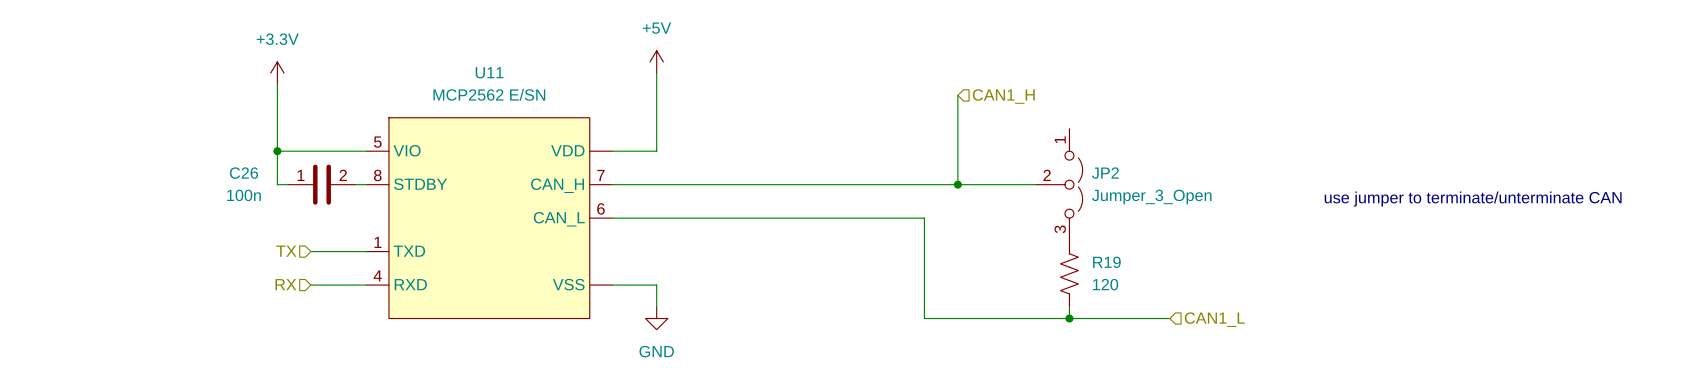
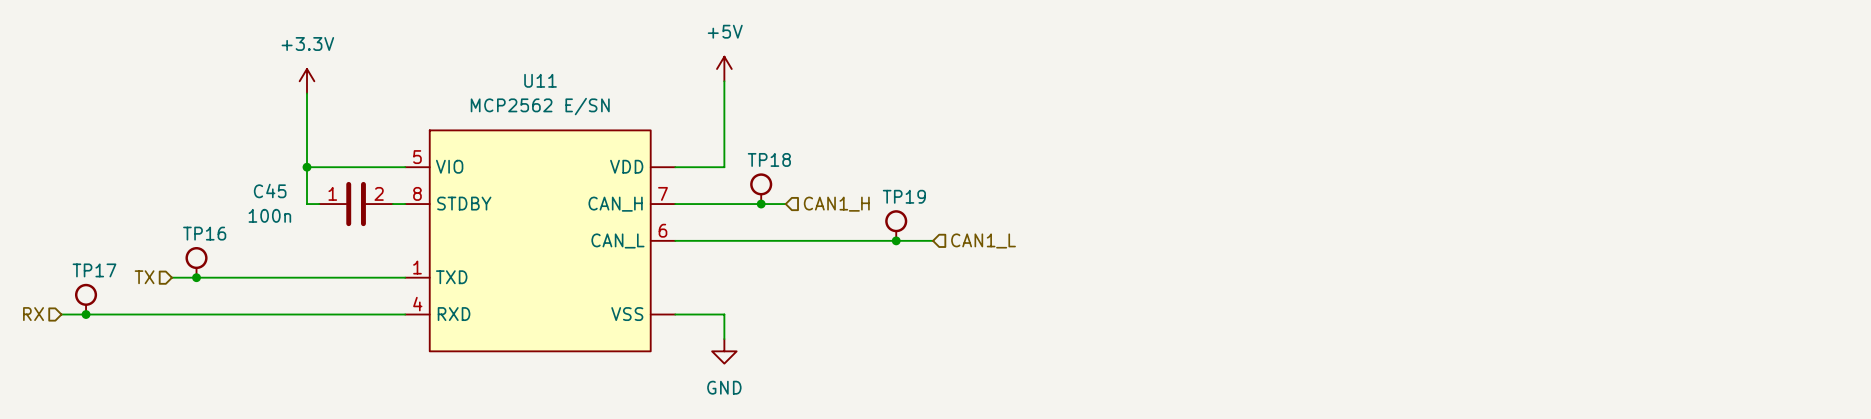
wire: (957, 95) (957, 184) -> none
hierarchical label: CAN1_H (1003, 96) -> none
TP18: none -> (761, 188)
C26 name: C26 (243, 173) -> C45 (270, 191)
junction: none -> (761, 204)
wire: (712, 184) (1035, 184) -> none
junction: (957, 184) -> none
JP2: Jumper_3_Open (1059, 184) -> none
hierarchical label: none -> CAN1_H (836, 204)
text: use jumper to terminate/unterminate CAN (1473, 199) -> none
TP19: none -> (896, 225)
junction: none -> (896, 240)
wire: (846, 218) (924, 218) (924, 318) (1169, 318) -> none
hierarchical label: none -> CAN1_L (983, 240)
TP16: none -> (196, 262)
wire: none -> (171, 277) (343, 277)
junction: none -> (196, 277)
hierarchical label position: TX (286, 251) -> TX (144, 277)
TP17: none -> (86, 299)
R19: 120 (1069, 273) -> none
hierarchical label: none -> RX (33, 314)
hierarchical label: RX (285, 284) -> none
wire: none -> (61, 314) (343, 314)
junction: none -> (86, 314)
wire: (1069, 307) (1069, 318) -> none
junction: (1069, 318) -> none
hierarchical label: CAN1_L (1214, 319) -> none

